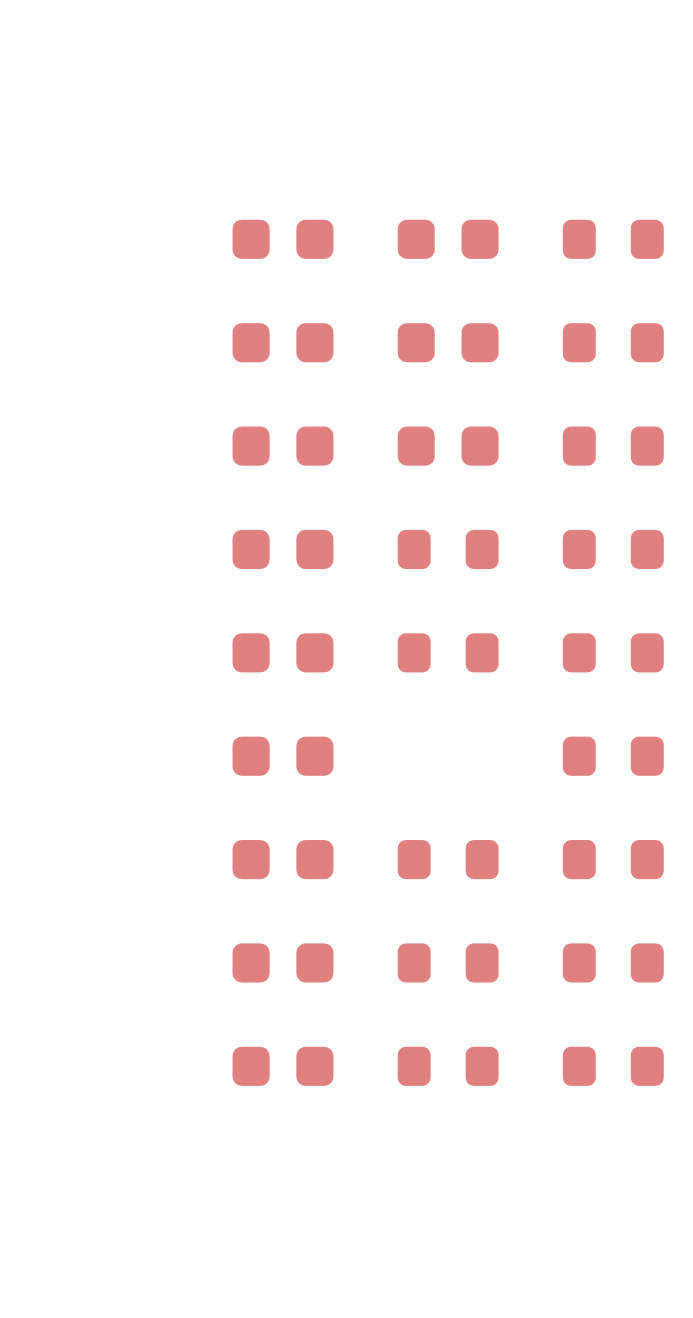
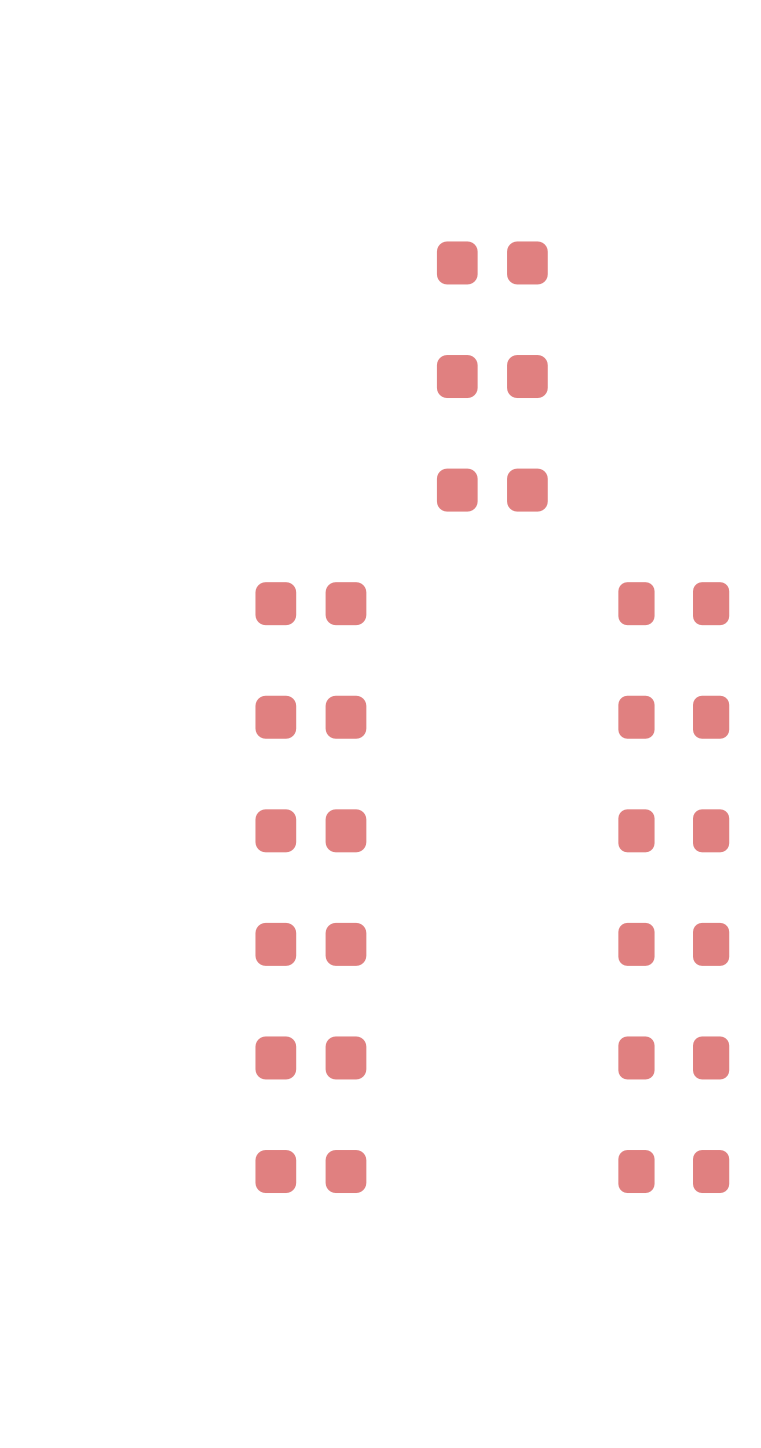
part: (282, 239) -> none
part: (613, 239) -> none
part: (282, 342) -> none
part: (613, 342) -> none
part: (282, 446) -> none
part: (613, 446) -> none
part: (448, 549) -> none
part: (448, 652) -> none
part: (448, 859) -> none
part: (448, 962) -> none
part: (448, 1066) -> none

